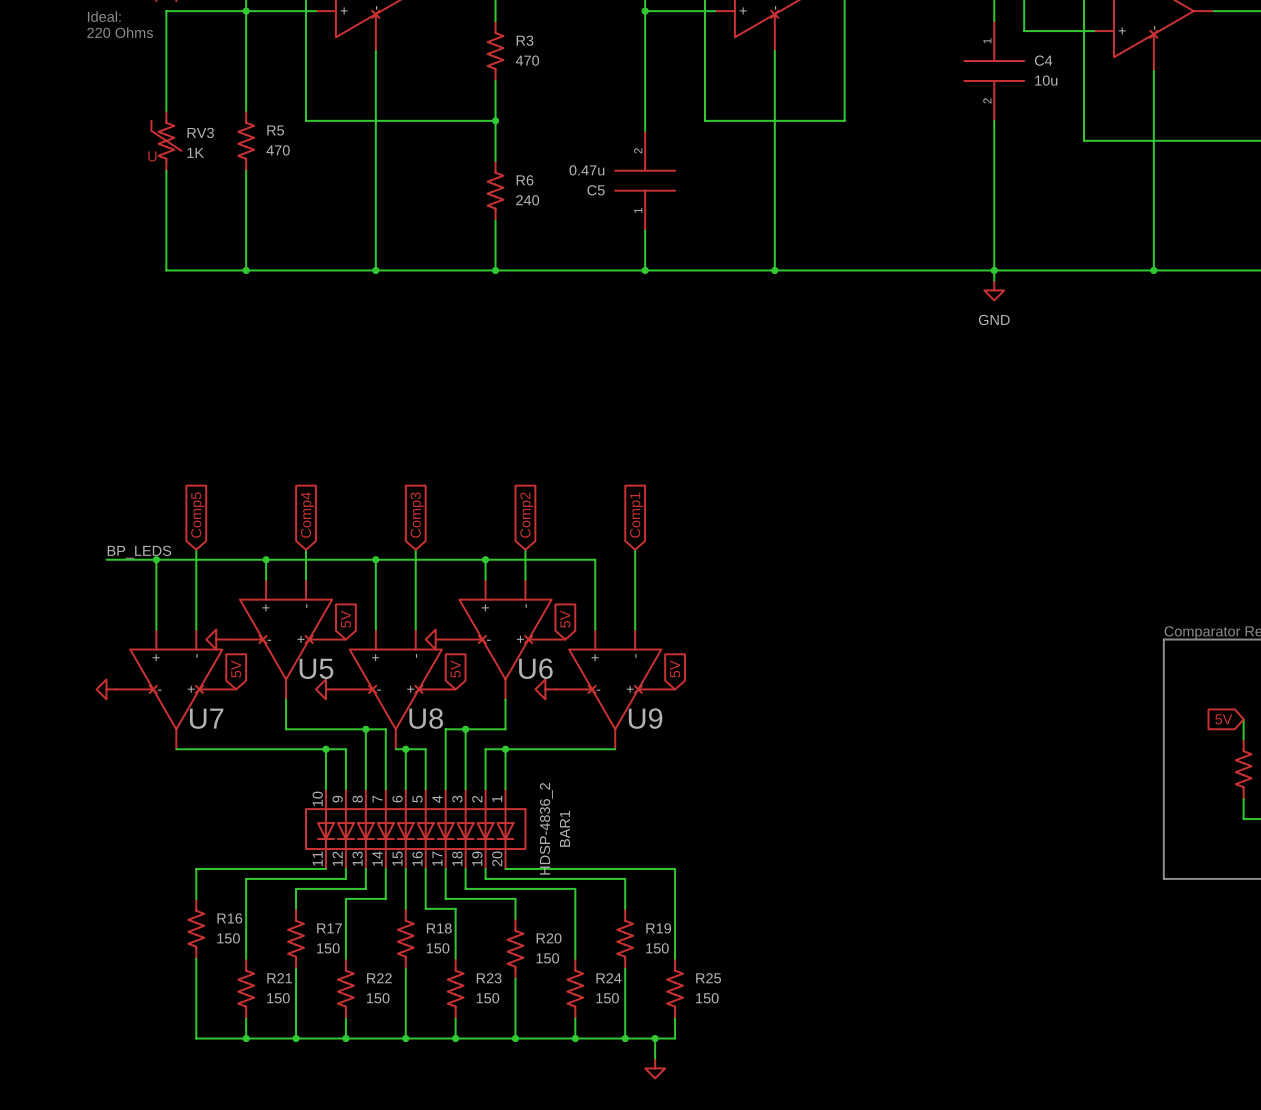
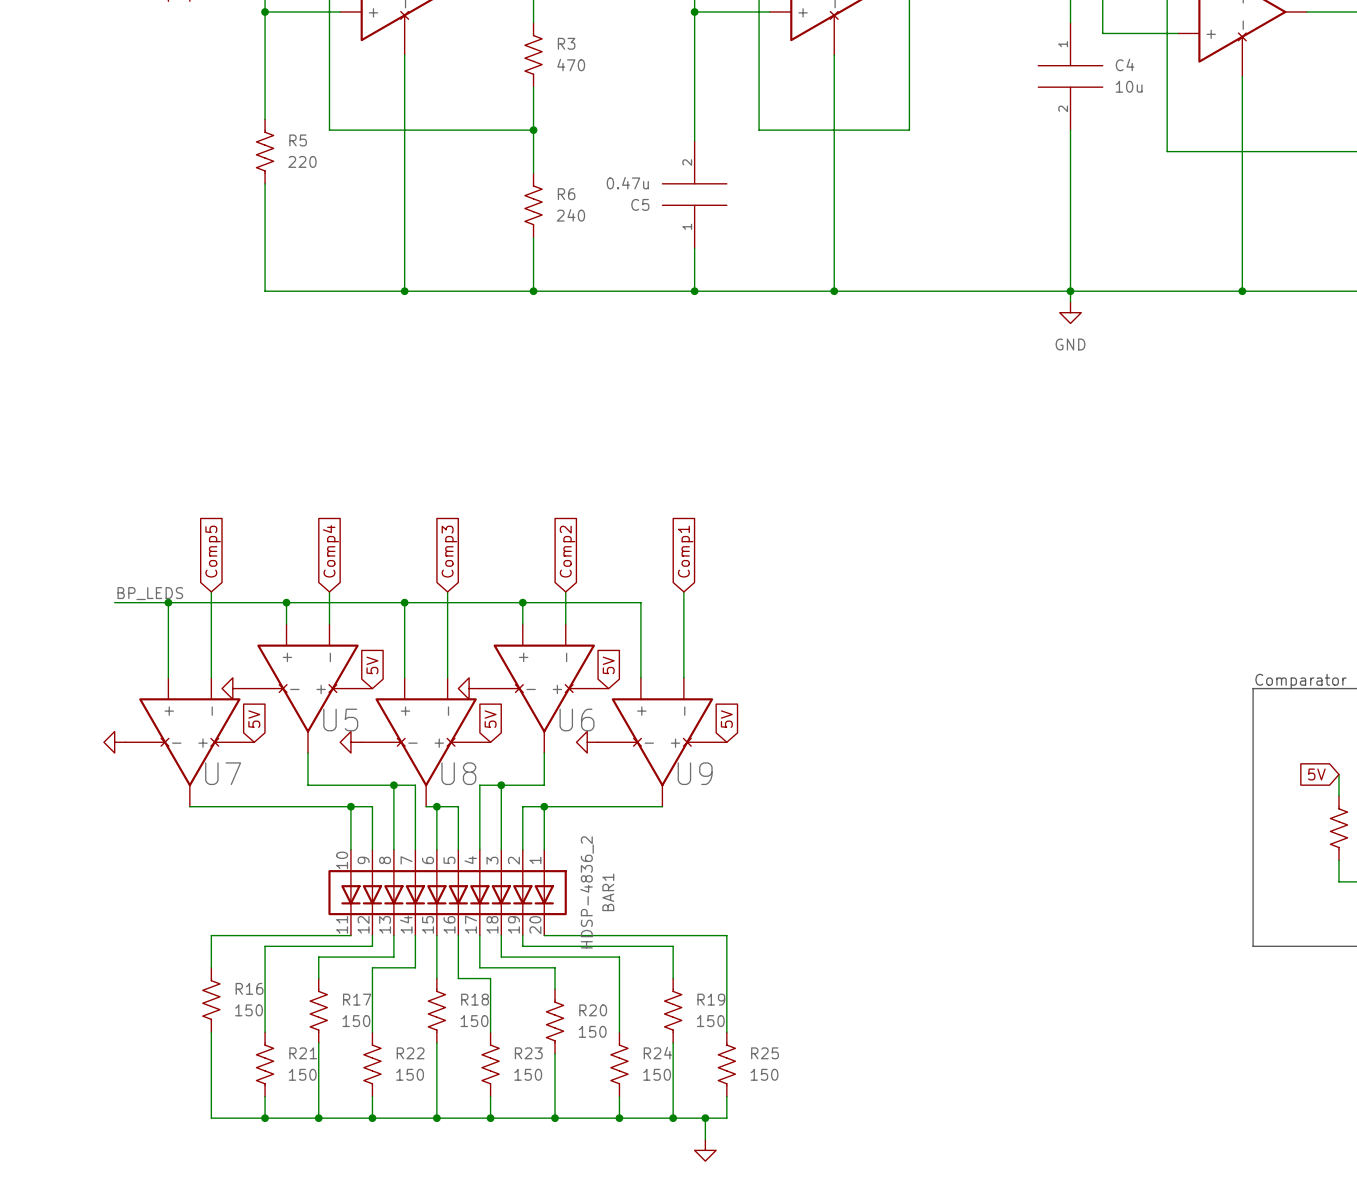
wire: (246, 11) (166, 11) (166, 110) -> none
text: Ideal: (104, 16) -> none
text: 220 Ohms (120, 32) -> none
RV3: 1K (166, 140) -> none
R5 value: 470 (278, 150) -> 220 (302, 161)
wire: (166, 170) (166, 270) (246, 270) -> none
junction: (246, 270) -> none

